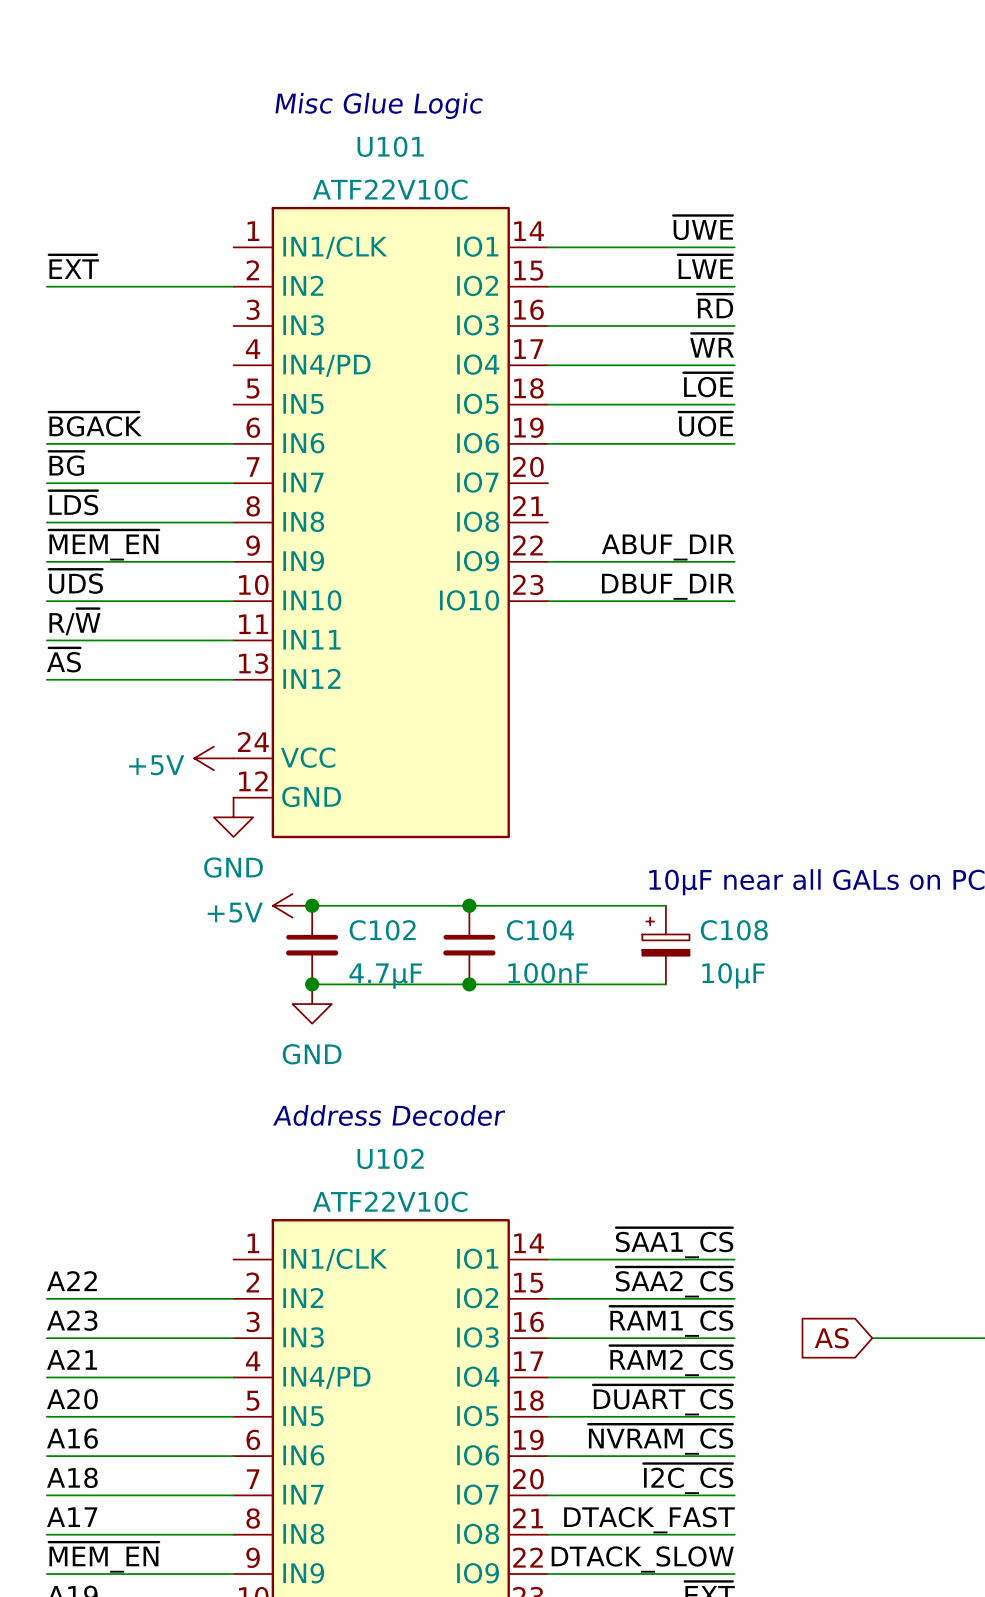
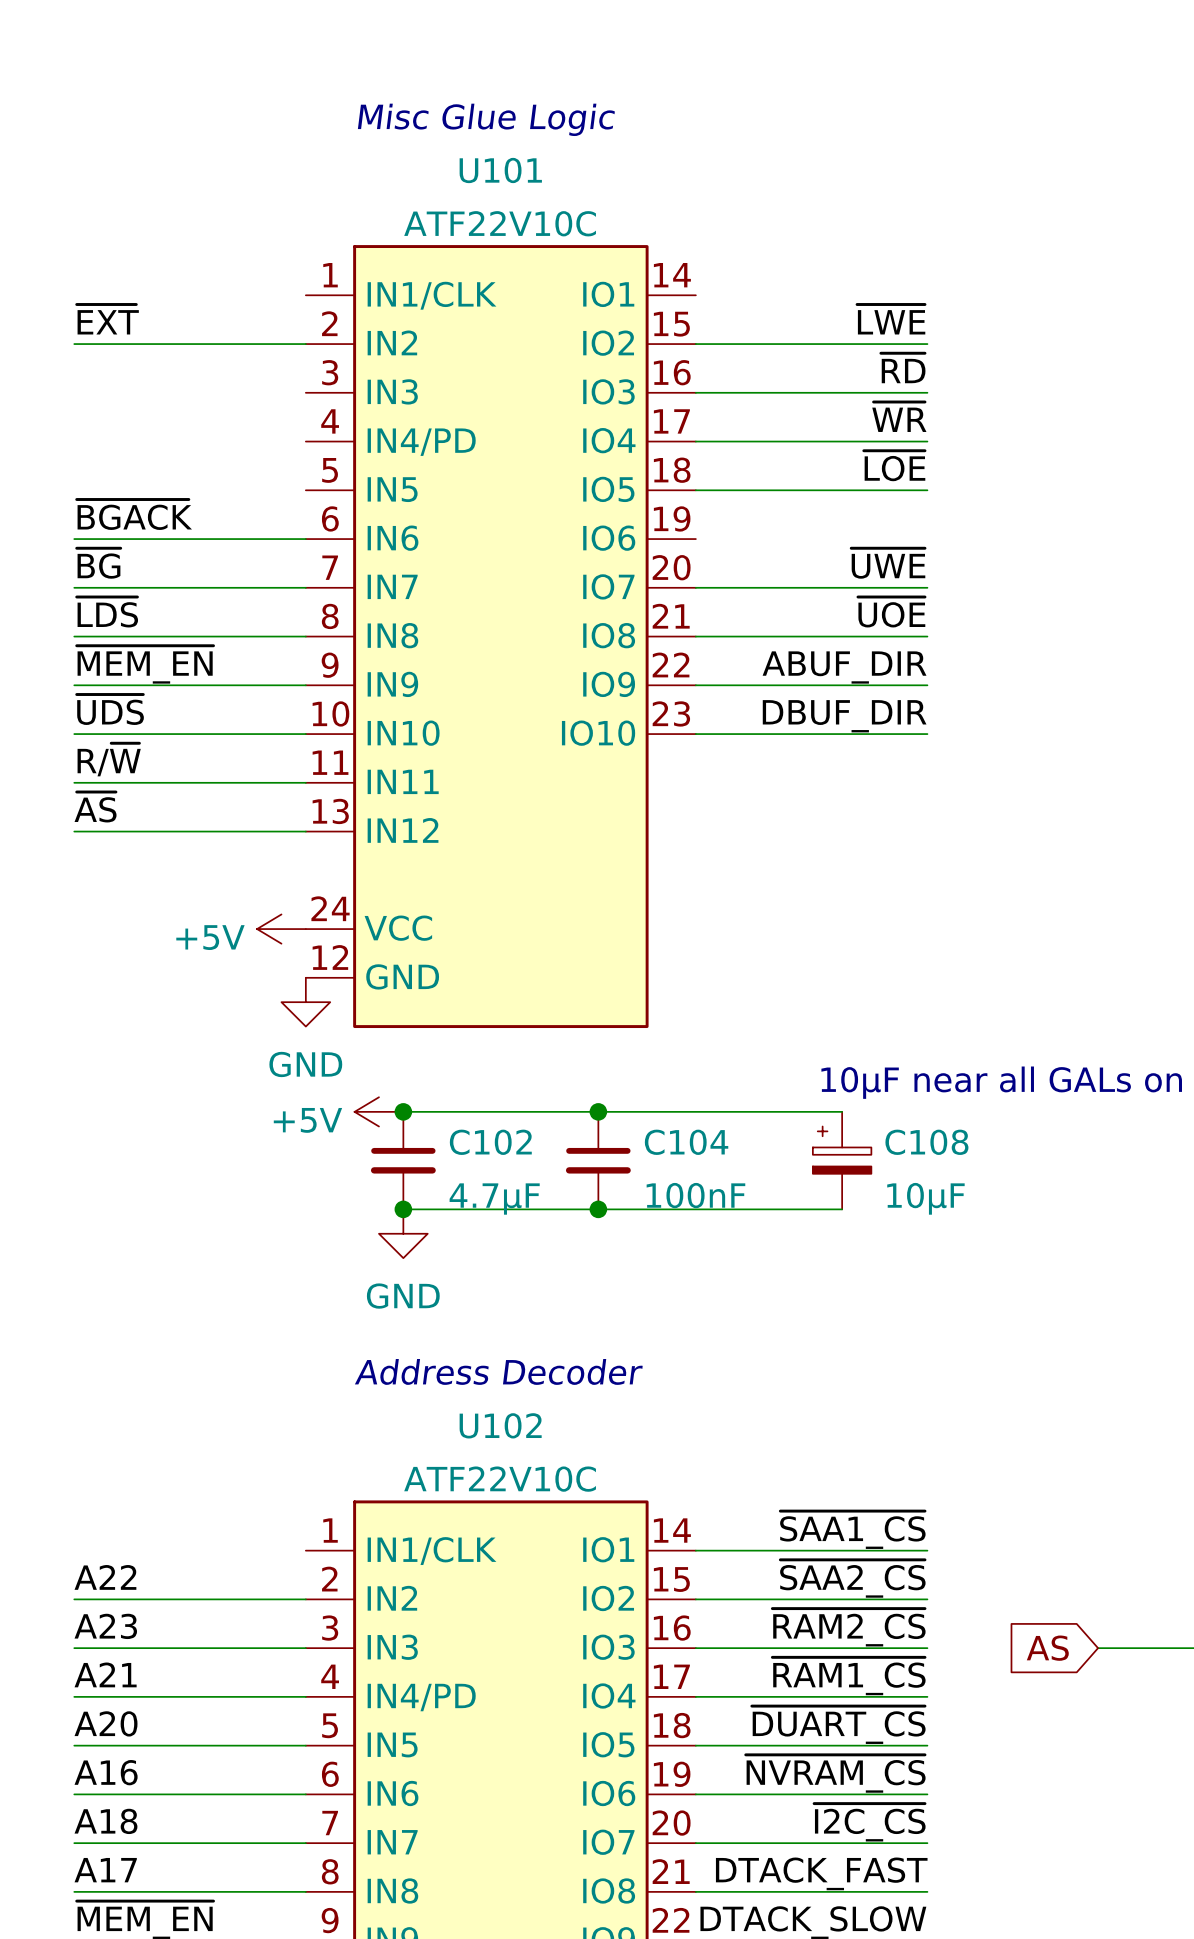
label position: ~{UWE} (703, 227) -> ~{UWE} (888, 563)
wire: (548, 247) (734, 247) -> (695, 636) (927, 636)
label position: ~{UOE} (705, 424) -> ~{UOE} (891, 612)
wire: (548, 443) (734, 443) -> (695, 587) (927, 587)
label: ~{RAM1_CS} (671, 1321) -> ~{RAM2_CS} (848, 1627)
label: ~{RAM2_CS} (671, 1360) -> ~{RAM1_CS} (848, 1676)

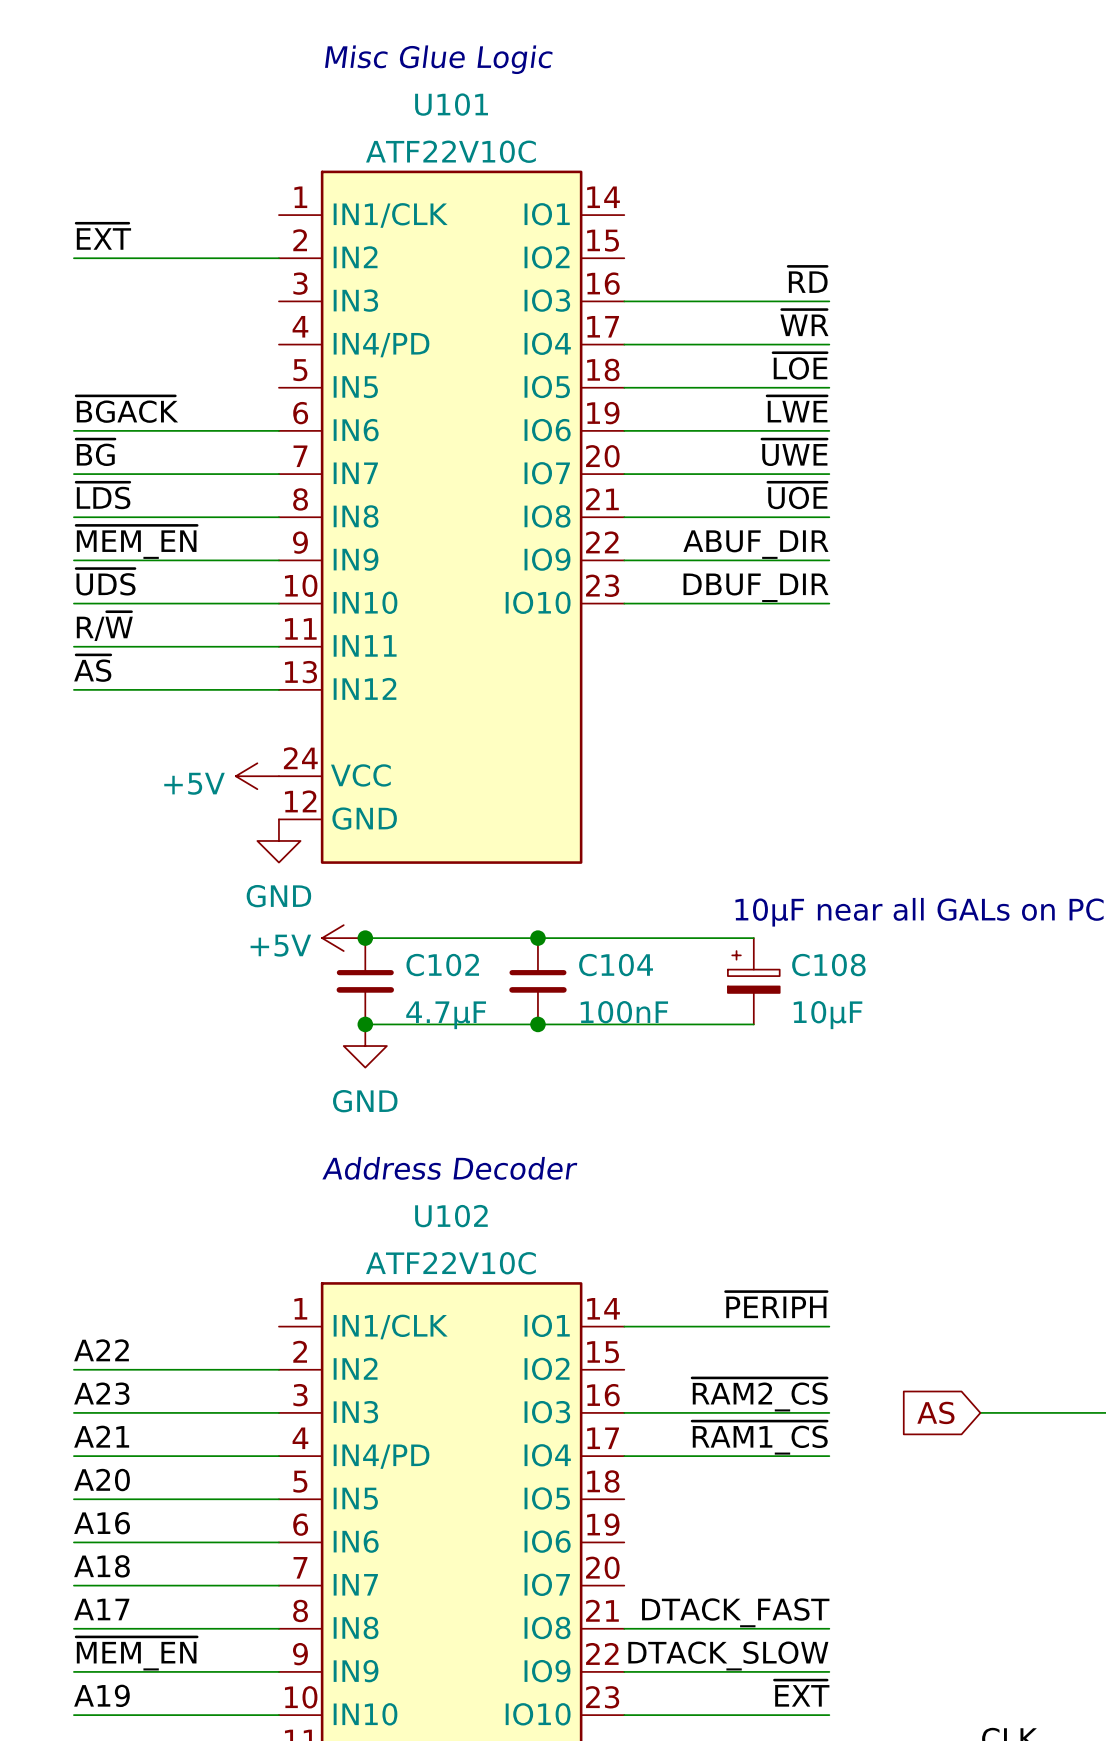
label position: ~{LWE} (891, 319) -> ~{LWE} (797, 409)
wire: (695, 344) (927, 344) -> (624, 430) (829, 430)
label: ~{SAA1_CS} (852, 1530) -> ~{PERIPH} (776, 1304)
label: ~{SAA2_CS} (852, 1578) -> none
wire: (695, 1599) (927, 1599) -> none
label: ~{DUART_CS} (838, 1725) -> none
wire: (695, 1745) (927, 1745) -> none
label: ~{NVRAM_CS} (835, 1773) -> none
wire: (695, 1794) (927, 1794) -> none
label: ~{I2C_CS} (869, 1822) -> none
wire: (695, 1843) (927, 1843) -> none

